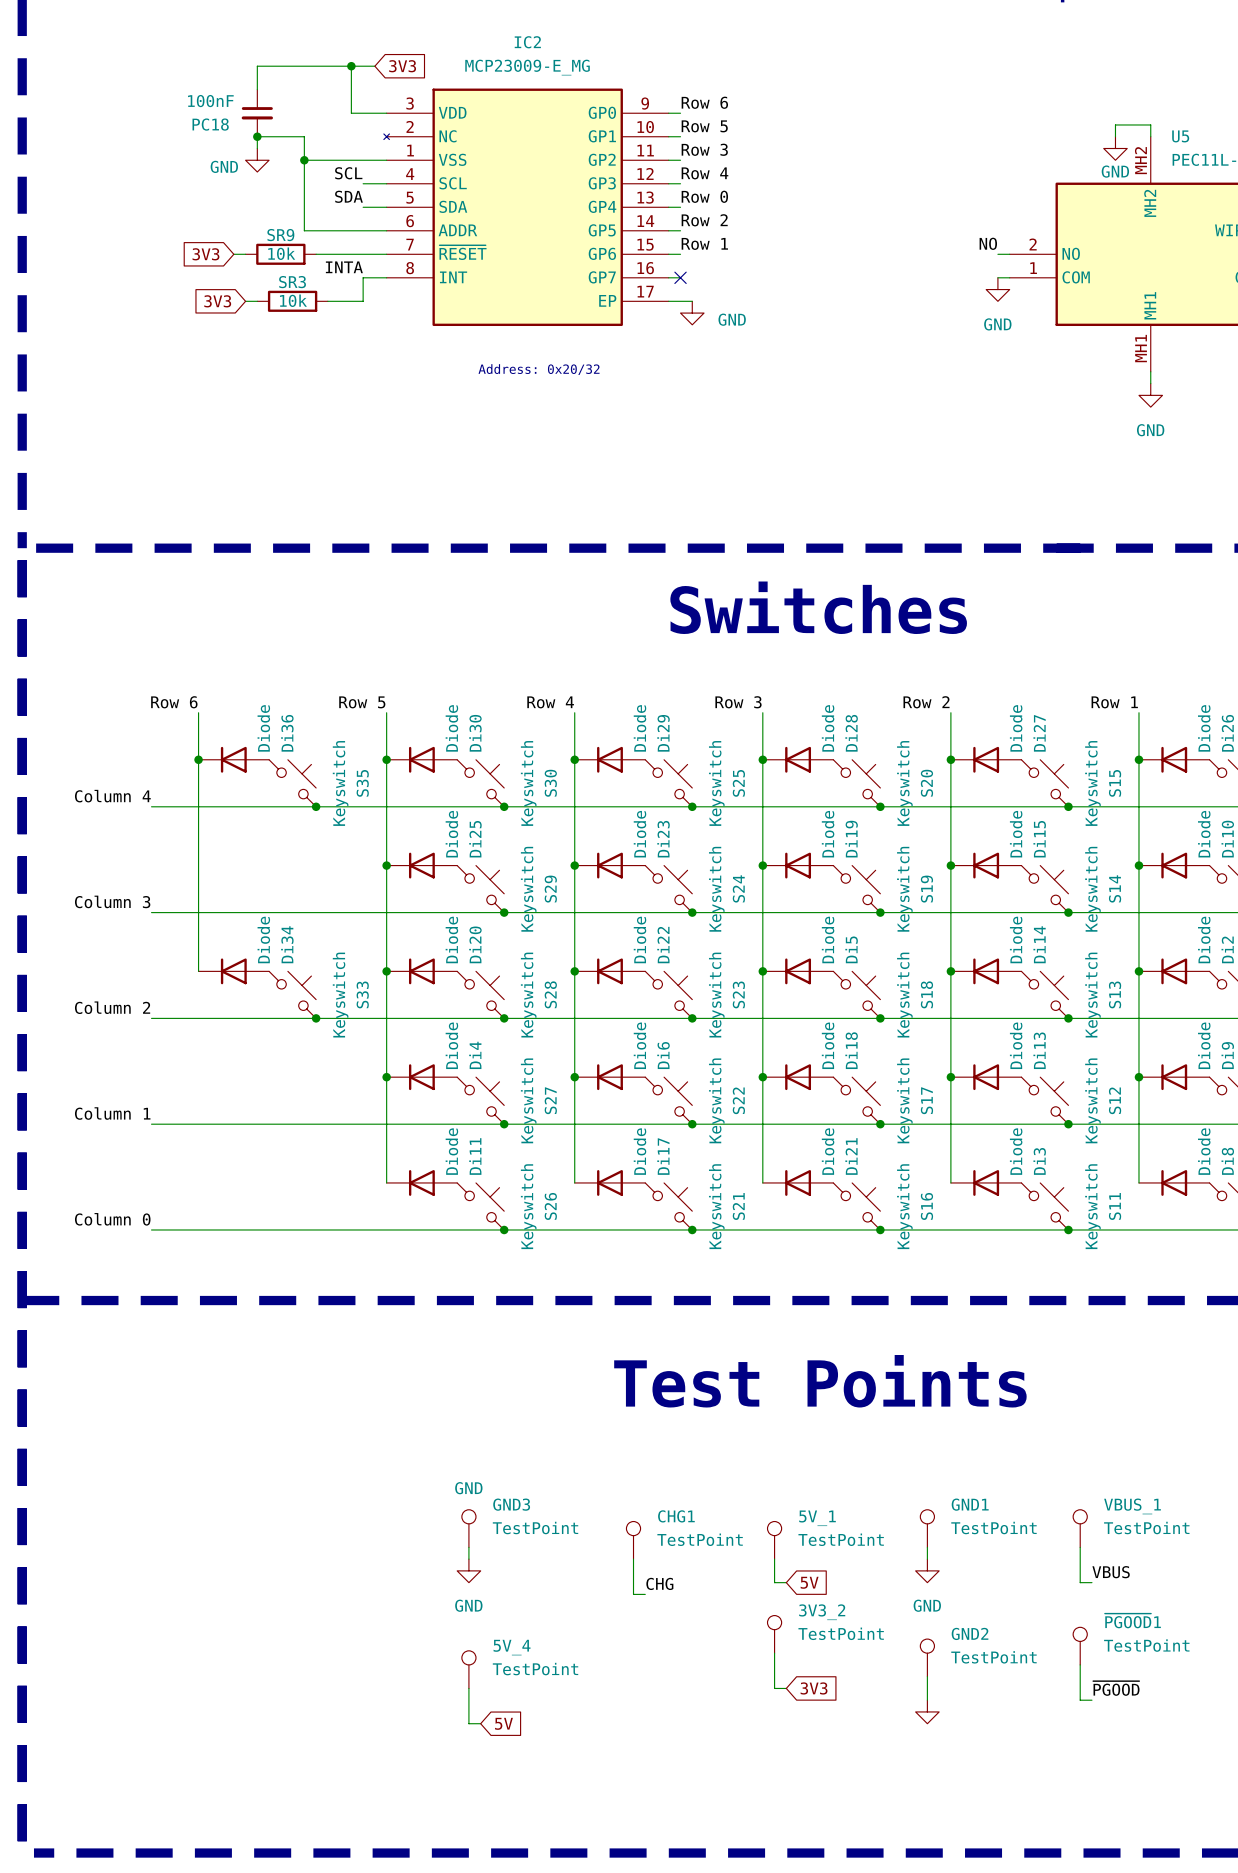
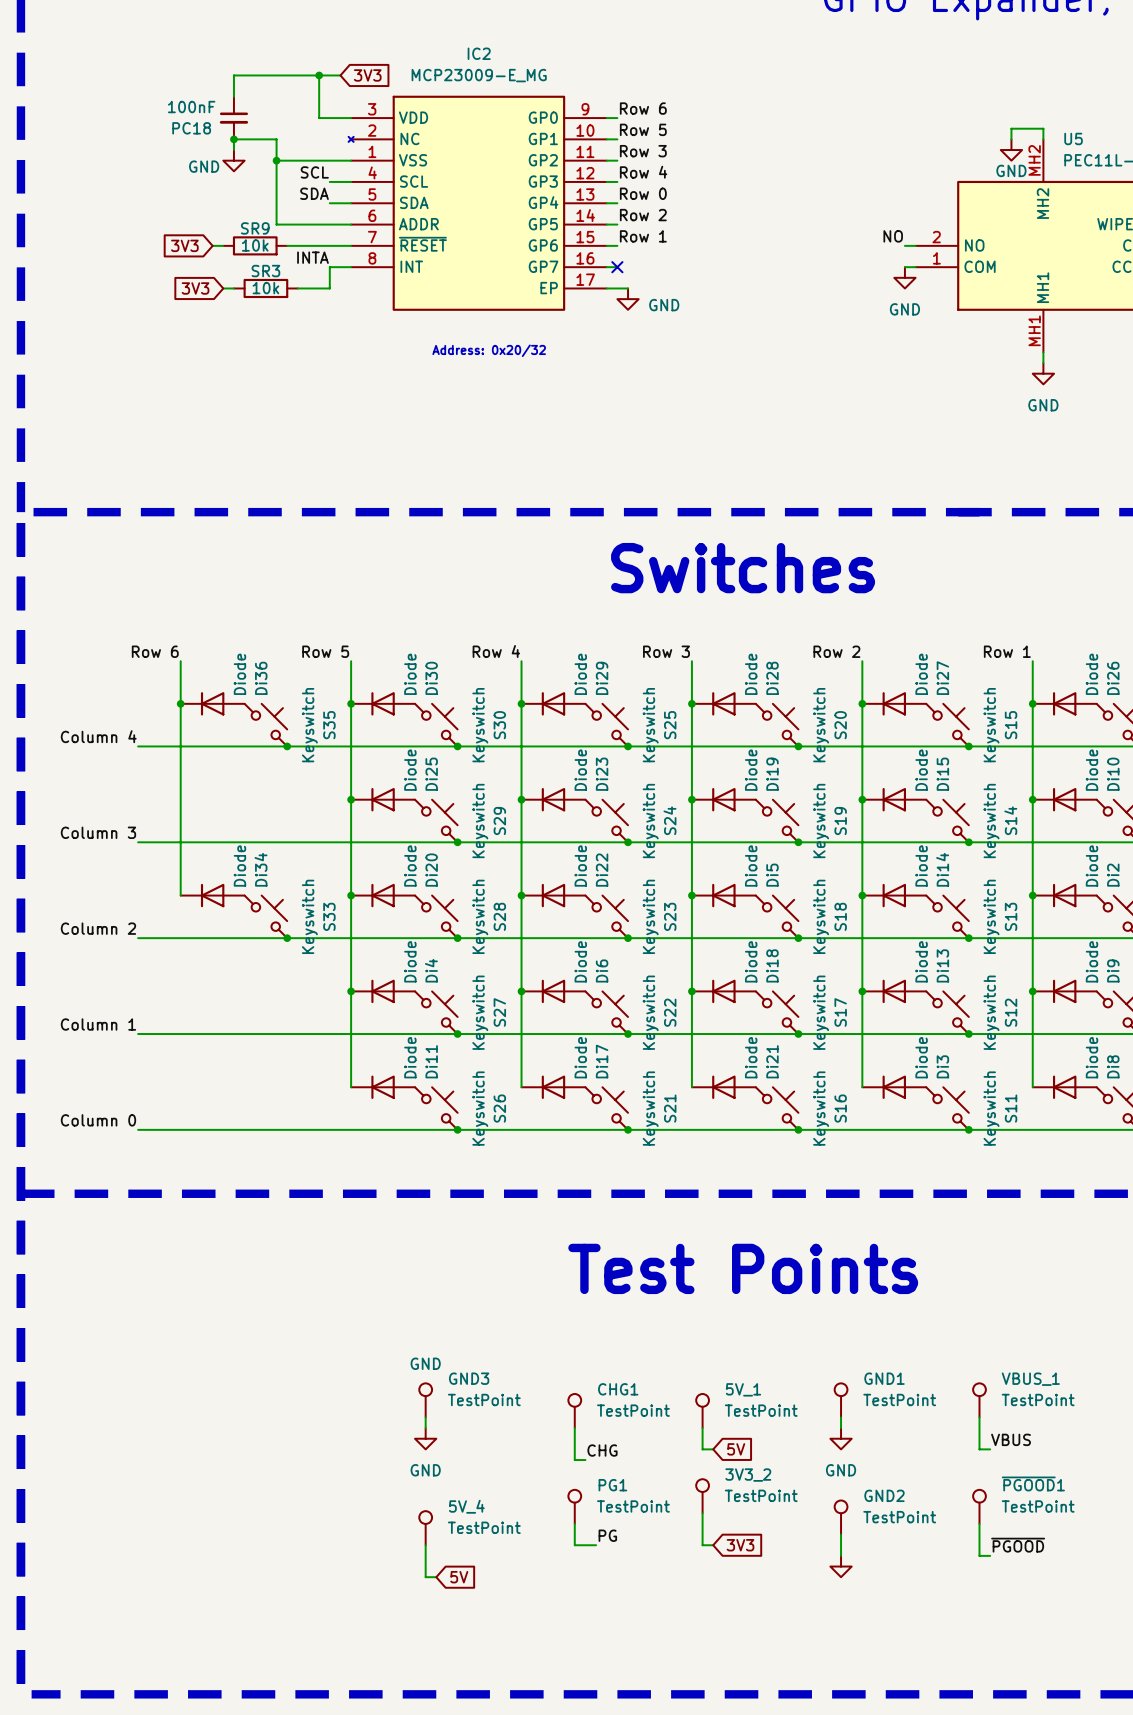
PG1: none -> TestPoint (574, 1506)
wire: none -> (574, 1523) (574, 1545) (596, 1545)
label: none -> PG (607, 1535)

